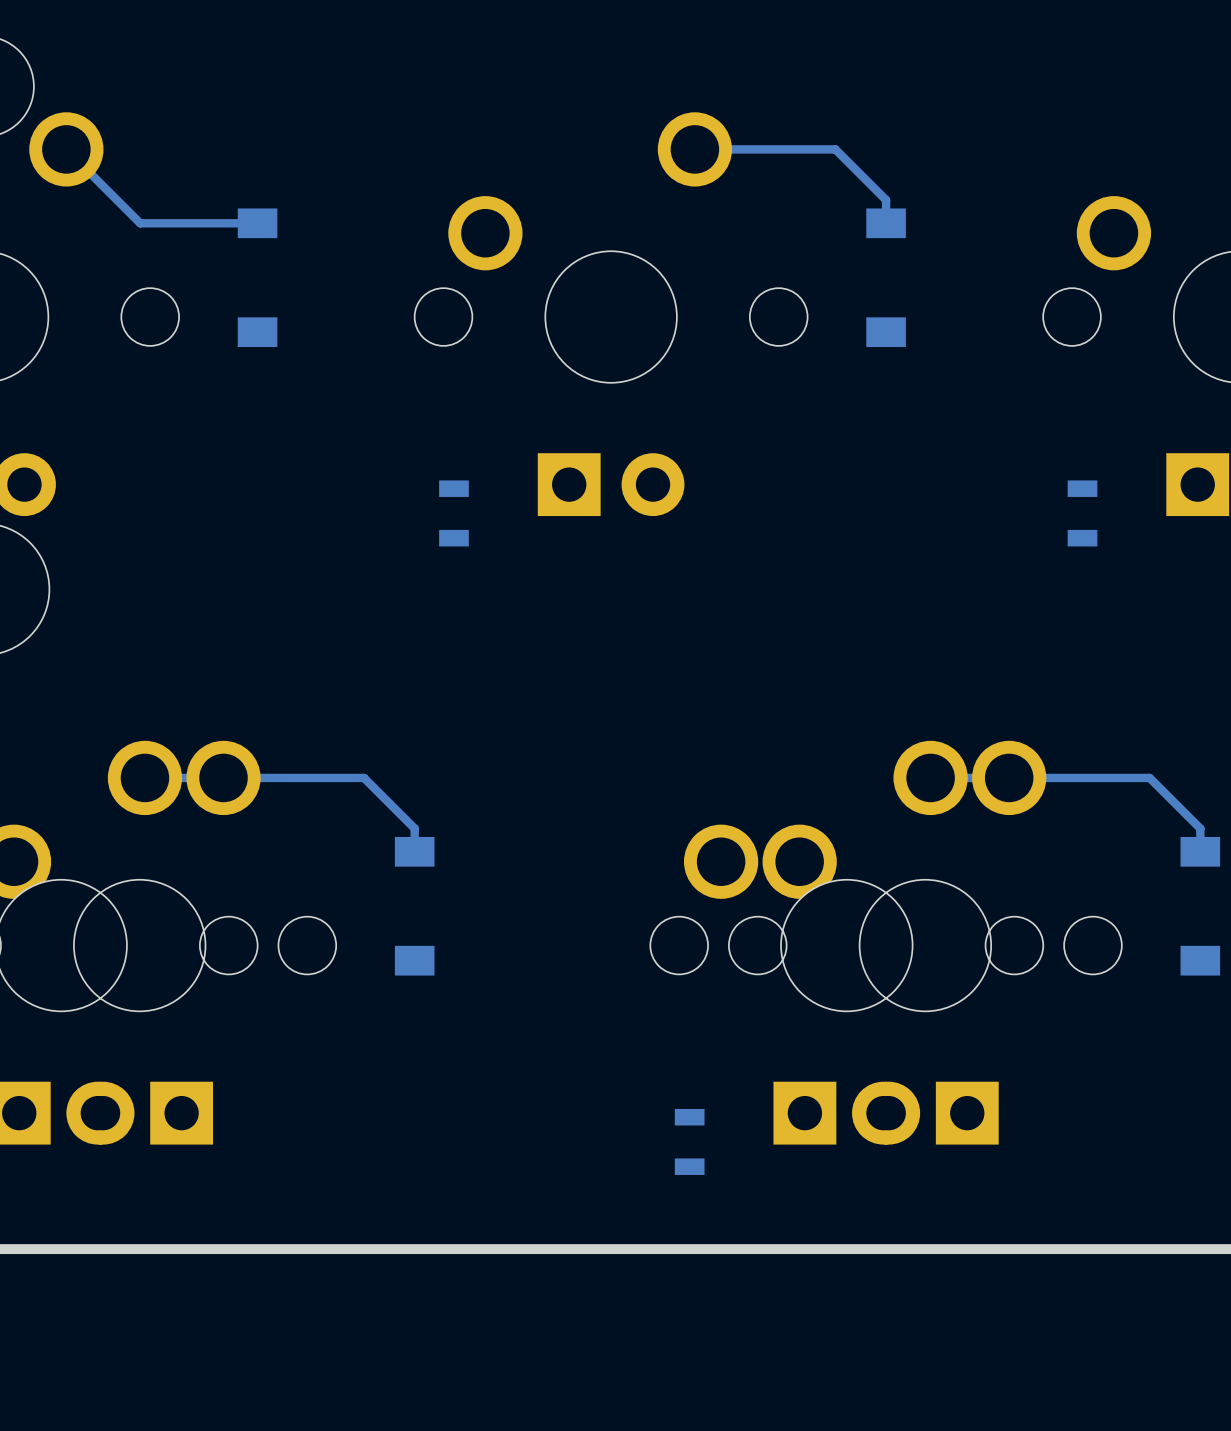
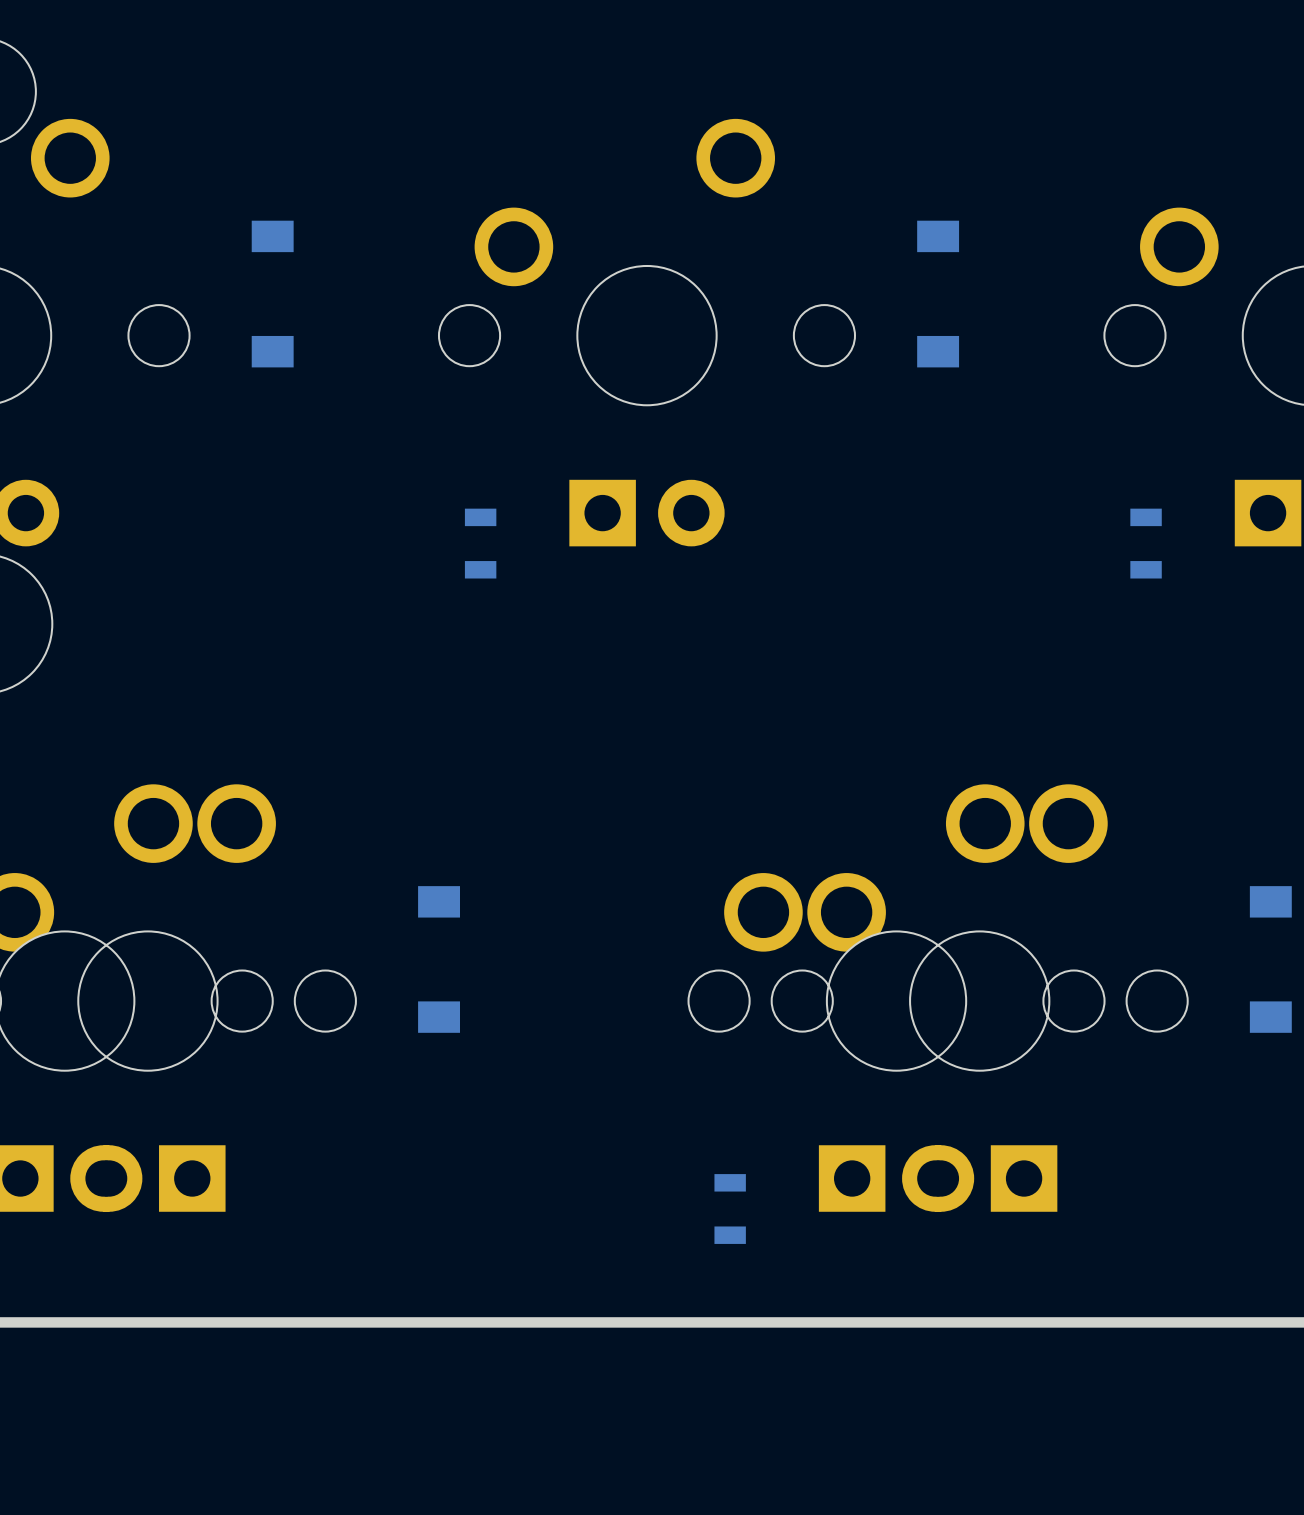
bottom track: (66, 149) (140, 223) (257, 223) -> none
bottom track: (694, 149) (835, 149) (886, 200) (886, 223) -> none
bottom track: (144, 777) (364, 777) (414, 828) (414, 851) -> none
bottom track: (930, 777) (1149, 777) (1200, 828) (1200, 851) -> none

